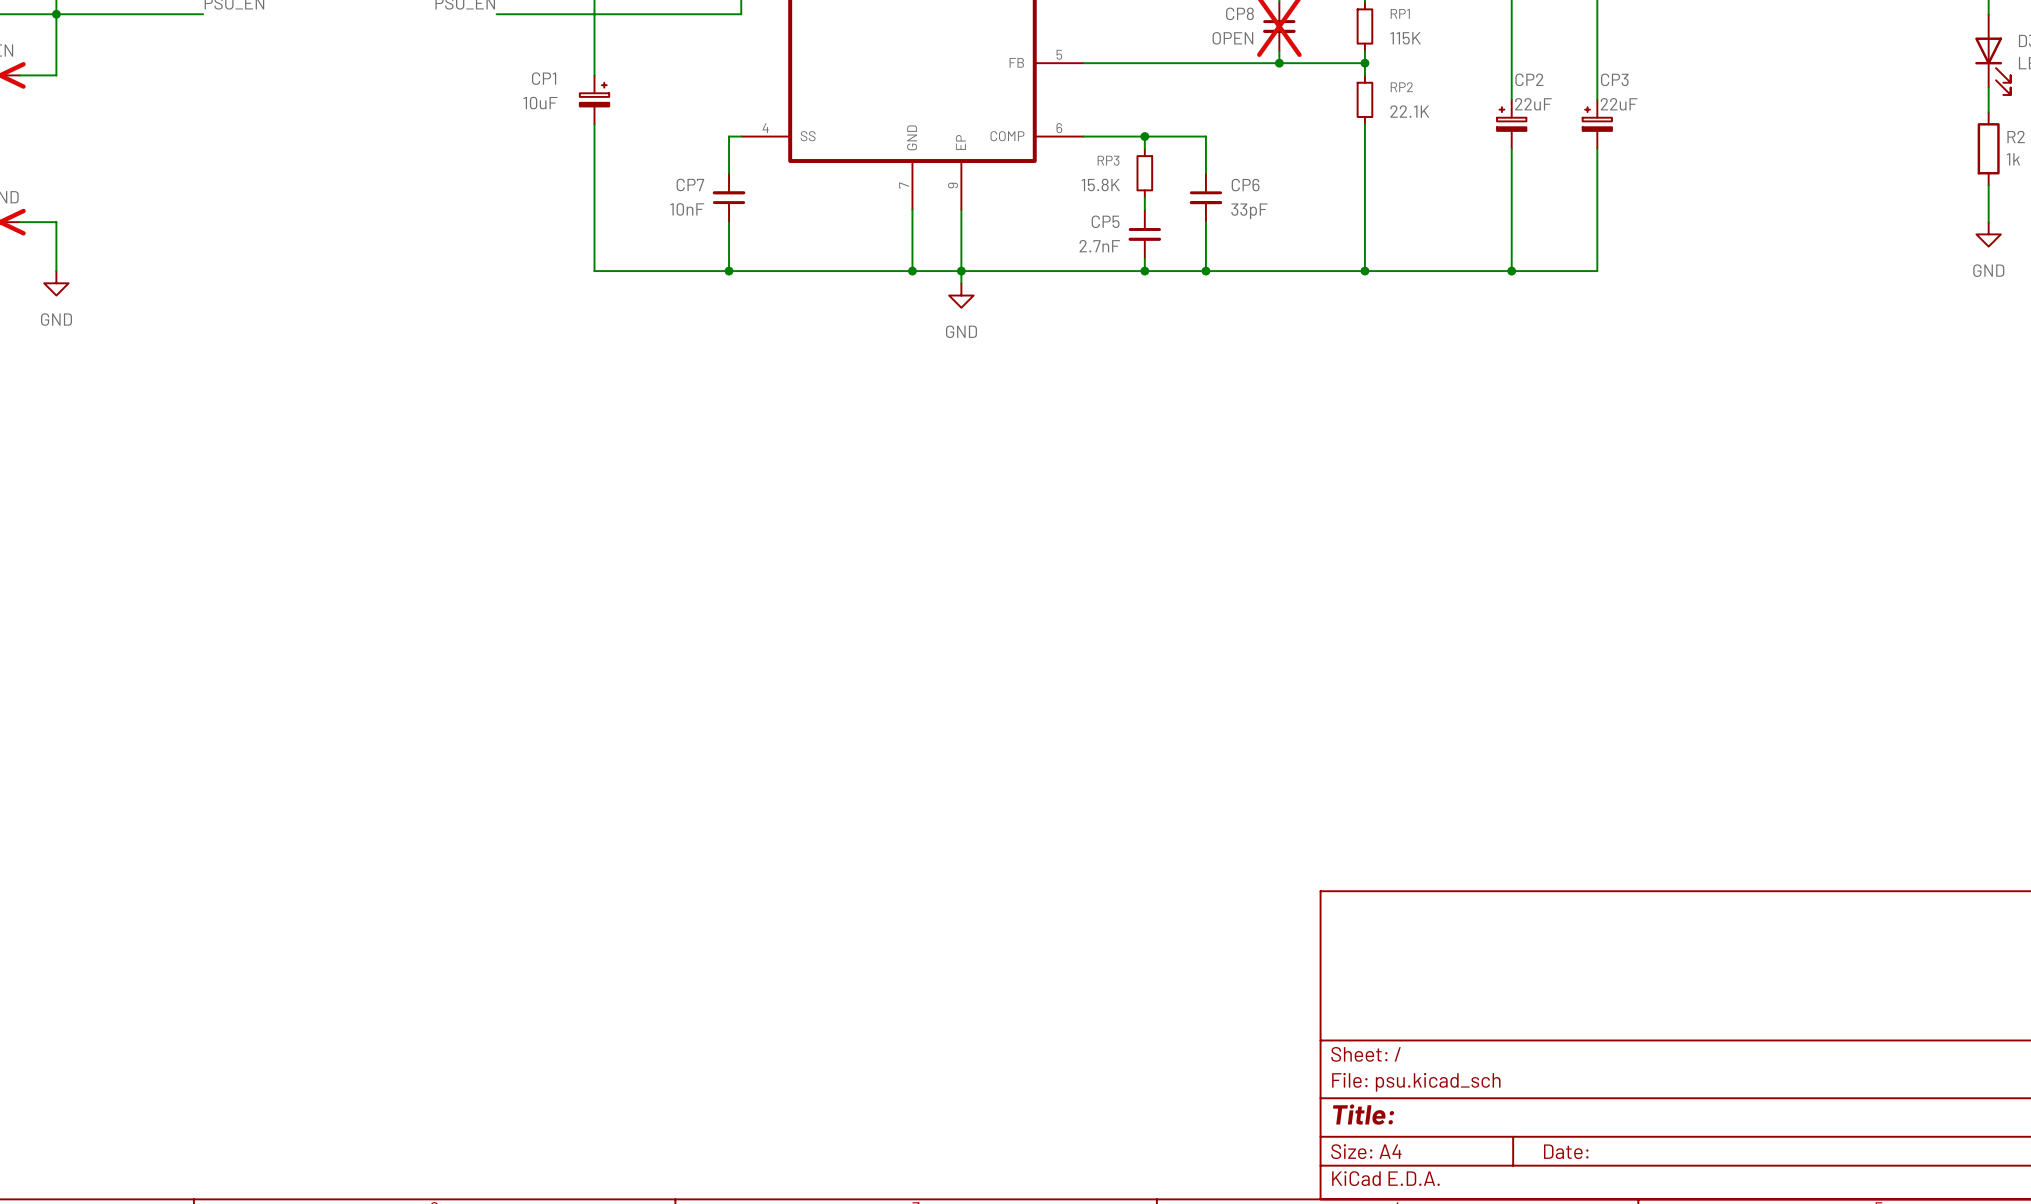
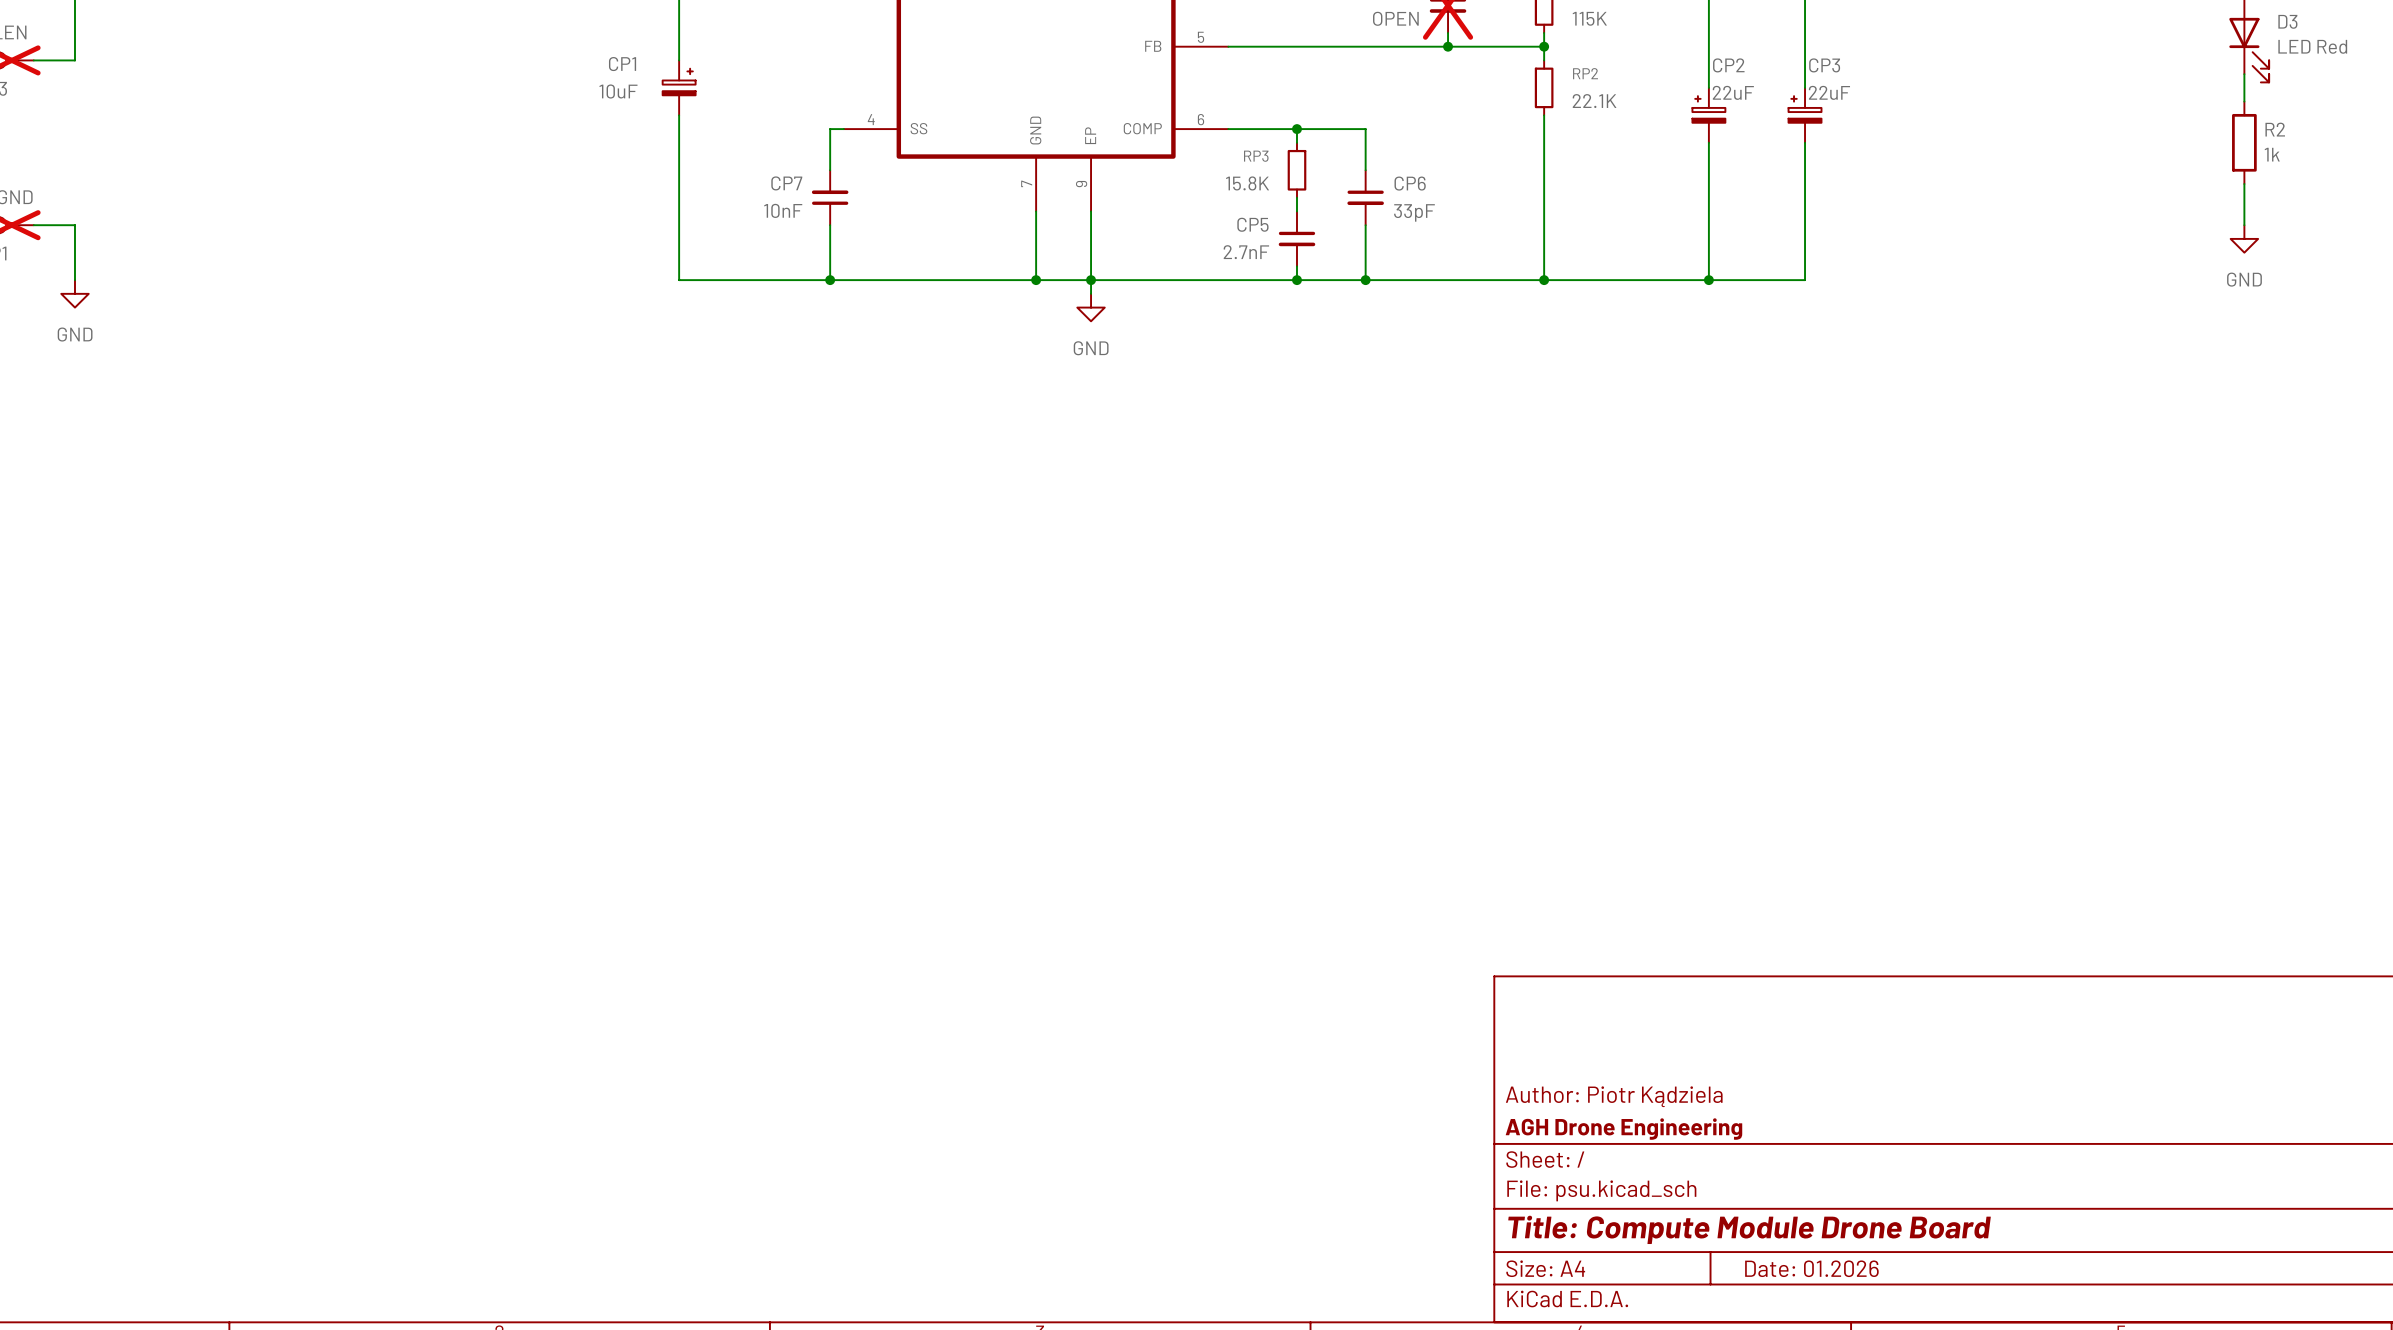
title block: none -> Author: Piotr Kądziela (1614, 1096)
title block: none -> AGH Drone Engineering (1623, 1129)
title block: Title: (1363, 1114) -> Title: Compute Module Drone Board (1749, 1229)
title block: Date: (1566, 1151) -> Date: 01.2026 (1811, 1268)

